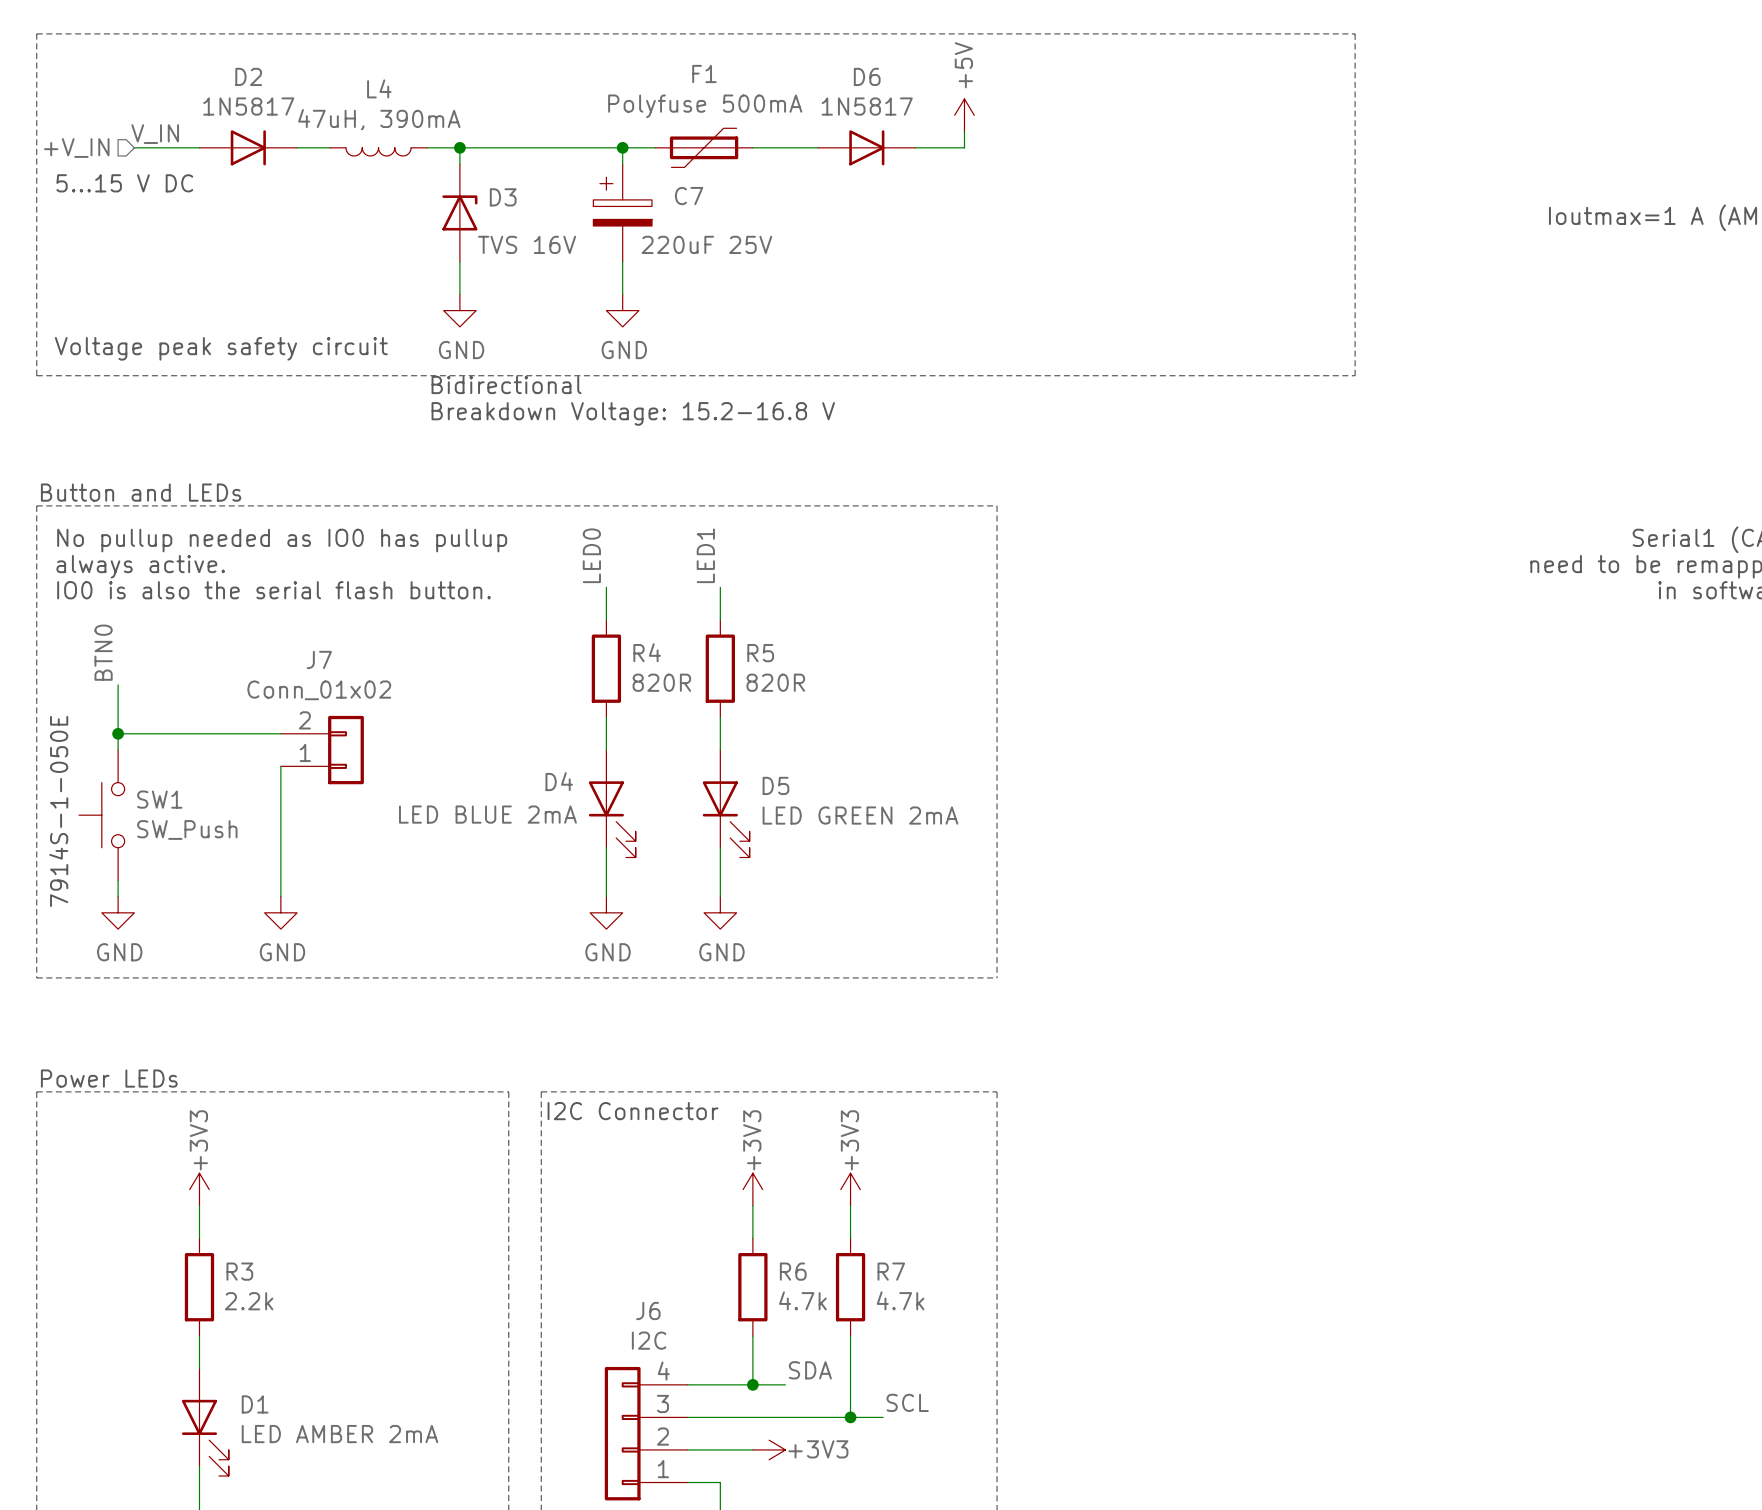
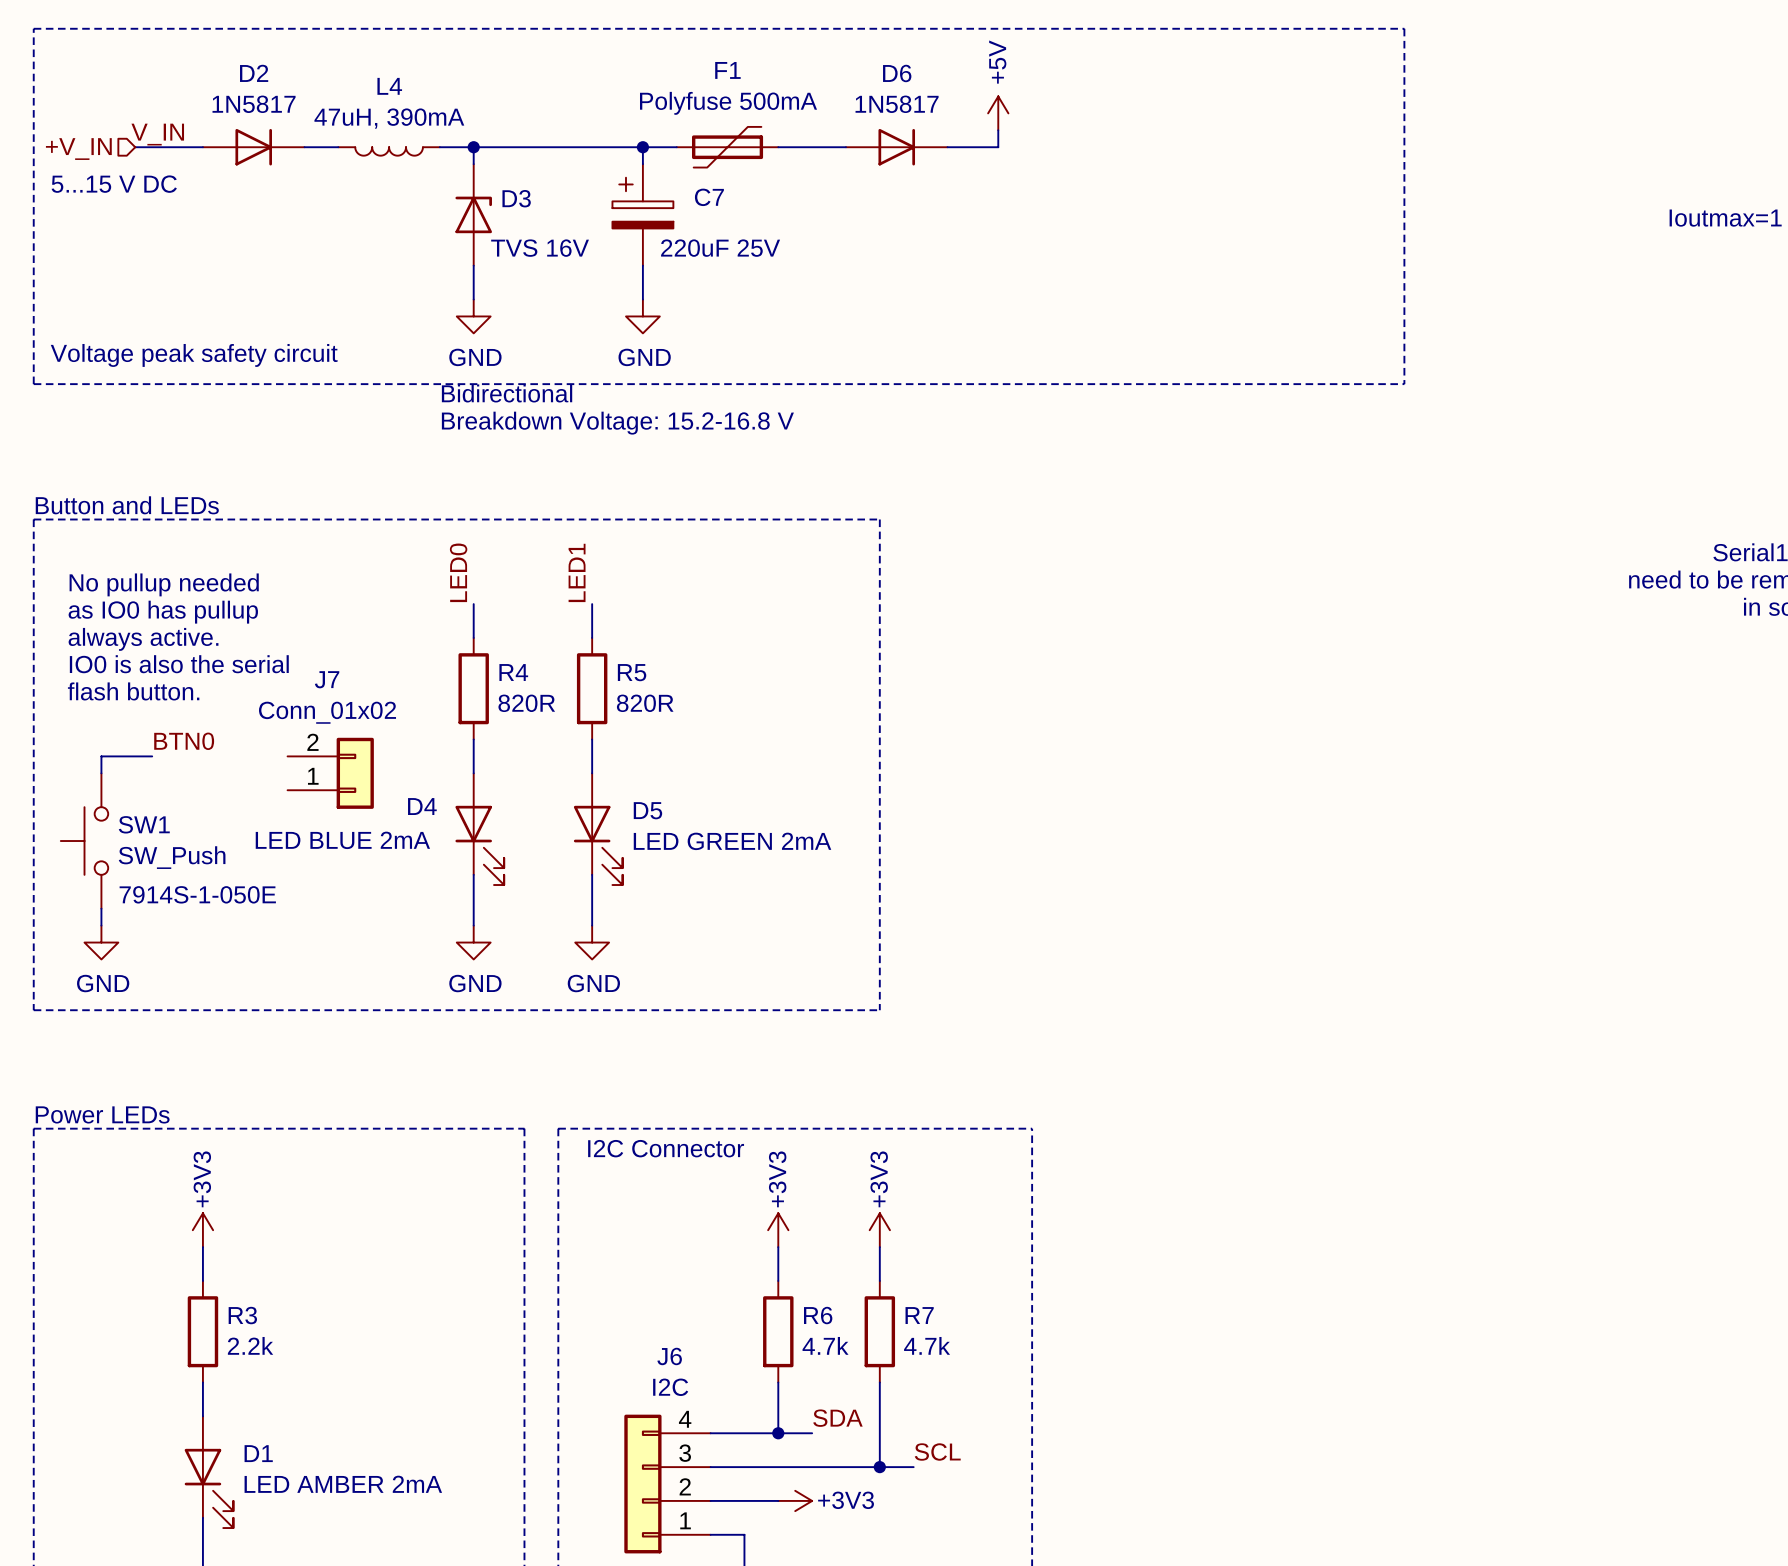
line: (850, 505) (997, 505) (997, 977) (850, 977) -> (879, 519) (879, 1010)
text: No pullup needed as IO0 has pullup (282, 540) -> No pullup needed (164, 584)
label position: LED0 (591, 555) -> LED0 (458, 572)
label position: LED1 (705, 555) -> LED1 (577, 572)
text position: always active. (140, 566) -> always active. (143, 639)
wire: (606, 587) (606, 619) -> (473, 604) (473, 637)
wire: (720, 587) (720, 619) -> (592, 604) (592, 637)
text: IO0 is also the serial flash button. (274, 590) -> none
text: none -> as IO0 has pullup (163, 612)
text: none -> IO0 is also the serial (179, 664)
label rotation: 0° (103, 652) -> 90° clockwise (184, 741)
label position: BTN0 (103, 652) -> BTN0 (184, 741)
R4 position: (606, 668) -> (473, 688)
R5 position: (720, 668) -> (592, 688)
text: none -> flash button. (133, 691)
wire: (118, 684) (118, 750) -> none
wire: (606, 717) (606, 750) -> (473, 739) (473, 773)
wire: (720, 717) (720, 750) -> (592, 739) (592, 773)
wire: none -> (118, 756) (101, 756) (101, 773)
junction: (118, 733) -> none
wire: (150, 733) (280, 733) -> none
wire: (280, 766) (280, 896) -> none
D4 position: (612, 803) -> (479, 829)
D5 position: (726, 803) -> (598, 829)
text rotation: 0° (58, 811) -> 90° clockwise (197, 894)
SW1 position: (101, 815) -> (84, 841)
wire: (606, 847) (606, 896) -> (473, 874) (473, 925)
wire: (720, 847) (720, 896) -> (592, 874) (592, 925)
wire: (118, 880) (118, 896) -> (101, 908) (101, 925)
power symbol position: GND (118, 912) -> GND (101, 942)
power symbol: GND (280, 912) -> none
power symbol: none -> GND (473, 942)
power symbol position: GND (606, 912) -> GND (592, 942)
power symbol: GND (720, 912) -> none

